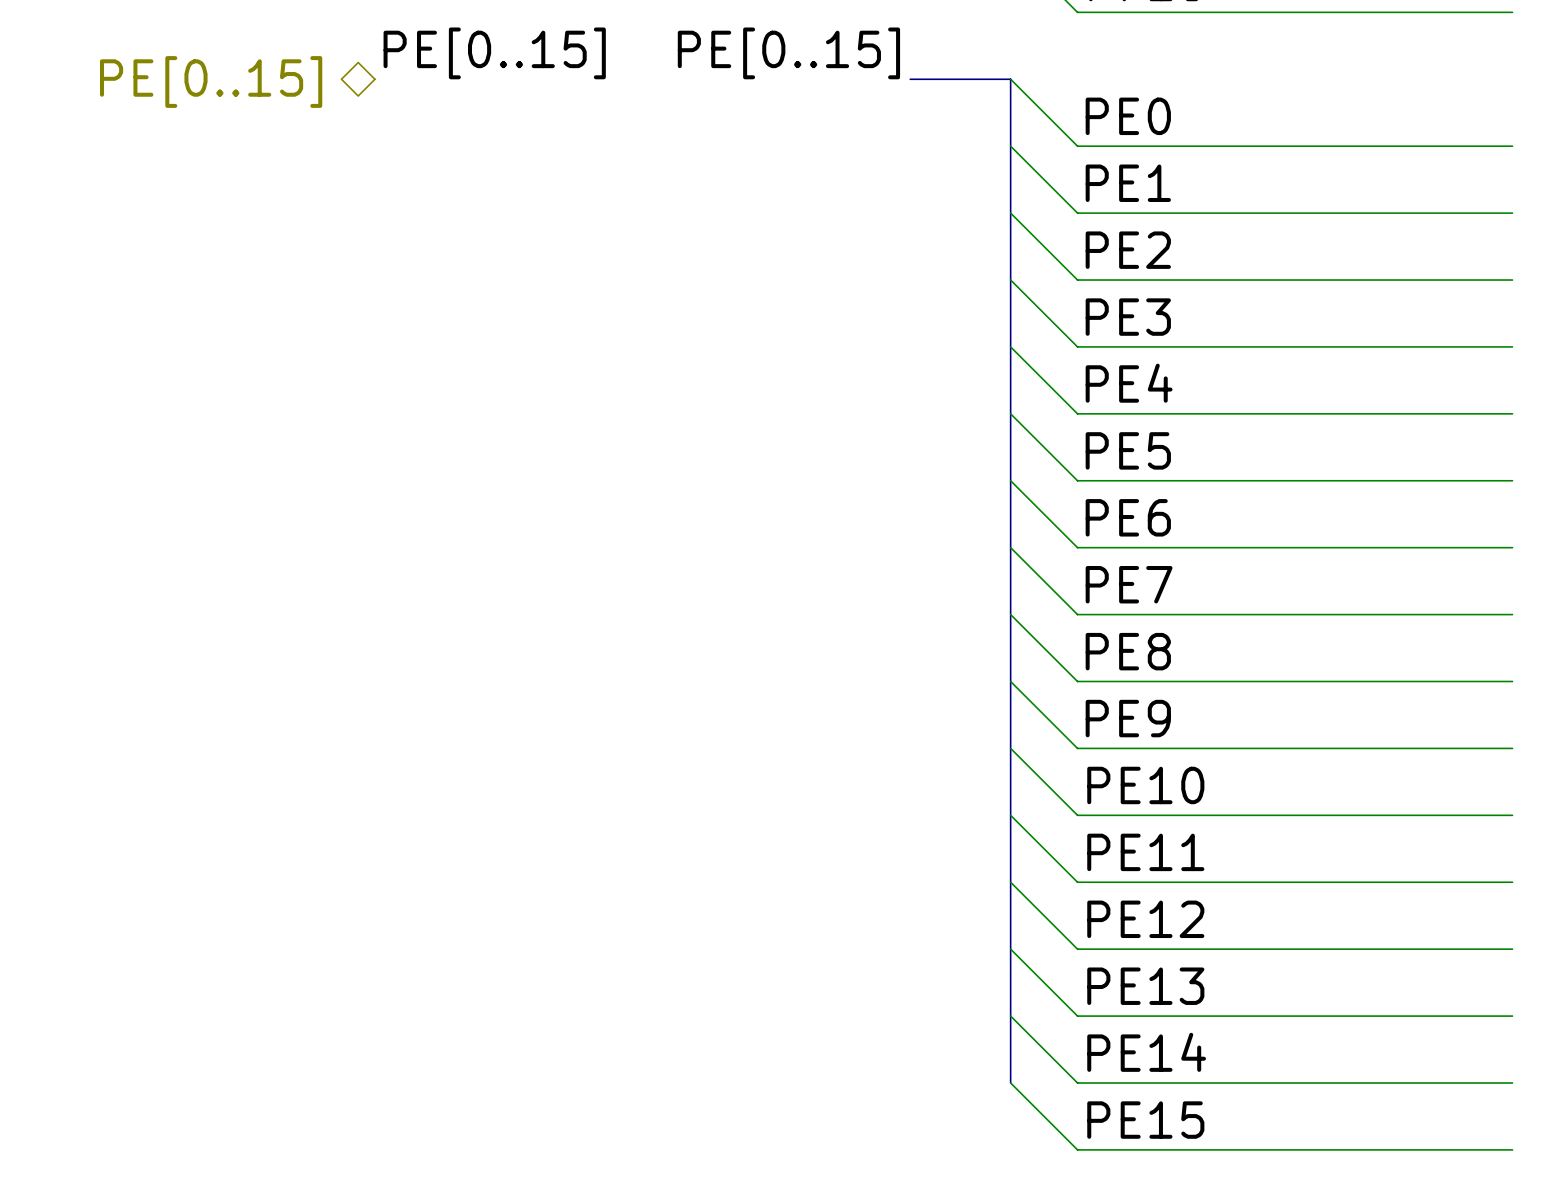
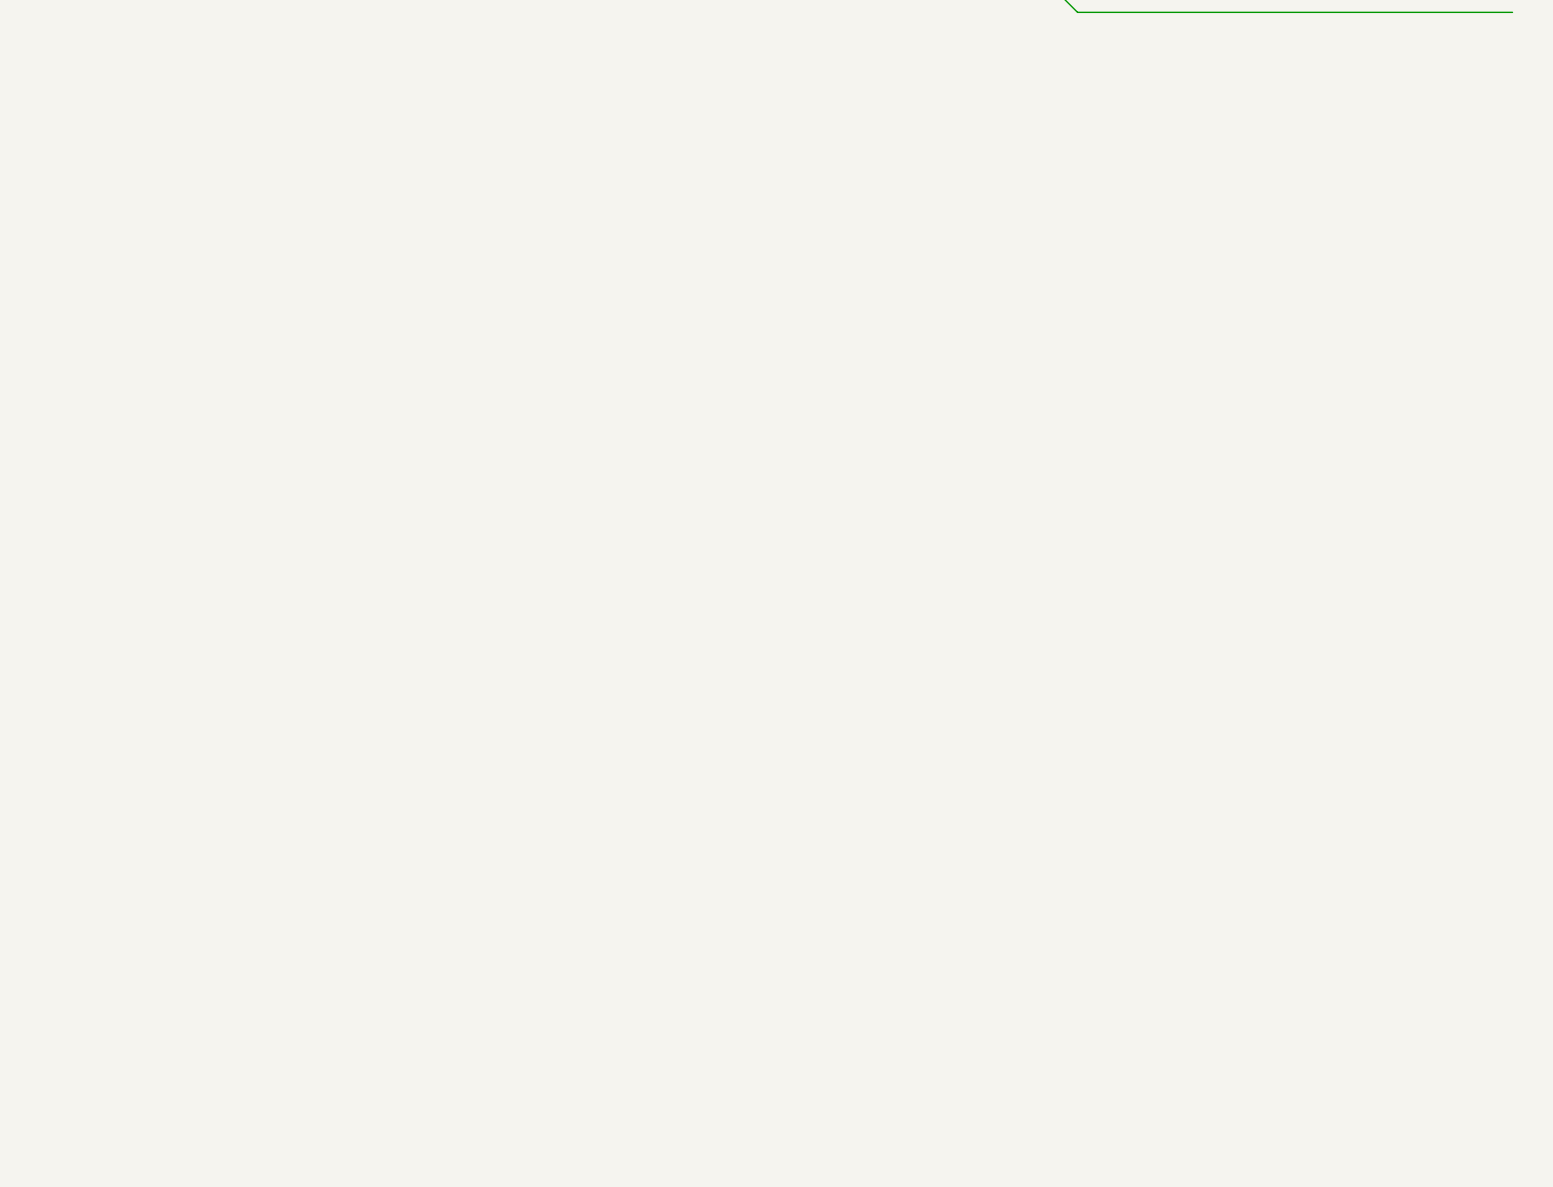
label: PE[0..15] (494, 53) -> none
label: PE[0..15] (788, 53) -> none
bus: (910, 79) (1010, 79) (1010, 1082) -> none
wire: (1010, 79) (1077, 146) (1512, 146) -> none
hierarchical label: PE[0..15] (211, 82) -> none
label: PE0 (1128, 116) -> none
wire: (1010, 146) (1077, 213) (1512, 213) -> none
label: PE1 (1128, 183) -> none
wire: (1010, 213) (1077, 280) (1512, 280) -> none
label: PE2 (1128, 250) -> none
wire: (1010, 280) (1077, 346) (1512, 346) -> none
label: PE3 (1128, 317) -> none
wire: (1010, 346) (1077, 413) (1512, 413) -> none
label: PE4 (1129, 383) -> none
wire: (1010, 413) (1077, 480) (1512, 480) -> none
label: PE5 (1128, 450) -> none
wire: (1010, 480) (1077, 547) (1512, 547) -> none
label: PE6 (1128, 517) -> none
wire: (1010, 547) (1077, 614) (1512, 614) -> none
label: PE7 (1129, 584) -> none
wire: (1010, 614) (1077, 681) (1512, 681) -> none
label: PE8 (1128, 651) -> none
wire: (1010, 681) (1077, 748) (1512, 748) -> none
label: PE9 (1128, 718) -> none
wire: (1010, 748) (1077, 815) (1512, 815) -> none
label: PE10 (1145, 785) -> none
wire: (1010, 815) (1077, 882) (1512, 882) -> none
label: PE11 (1145, 852) -> none
wire: (1010, 882) (1077, 949) (1512, 949) -> none
label: PE12 (1145, 919) -> none
wire: (1010, 949) (1077, 1016) (1512, 1016) -> none
label: PE13 (1145, 986) -> none
wire: (1010, 1016) (1077, 1082) (1512, 1082) -> none
label: PE14 (1146, 1052) -> none
wire: (1010, 1082) (1077, 1149) (1512, 1149) -> none
label: PE15 (1145, 1120) -> none

